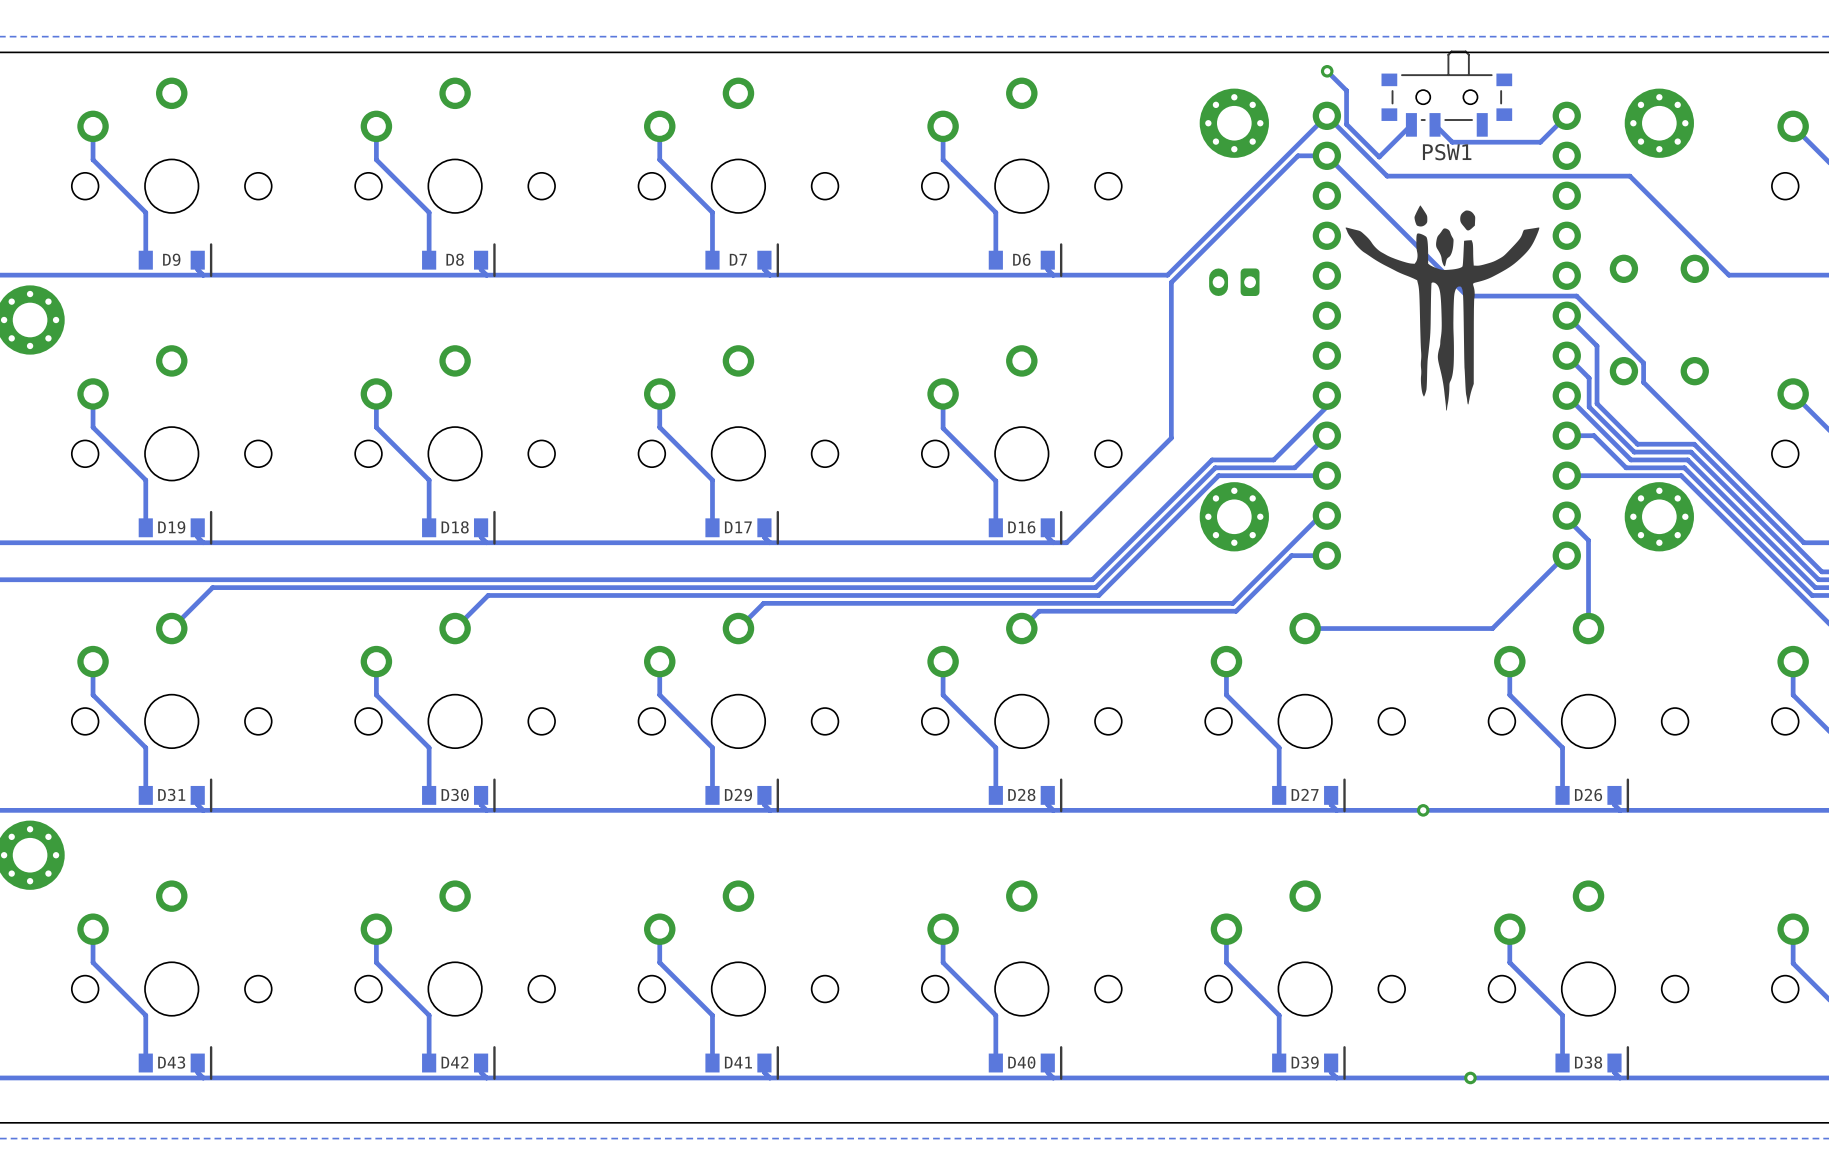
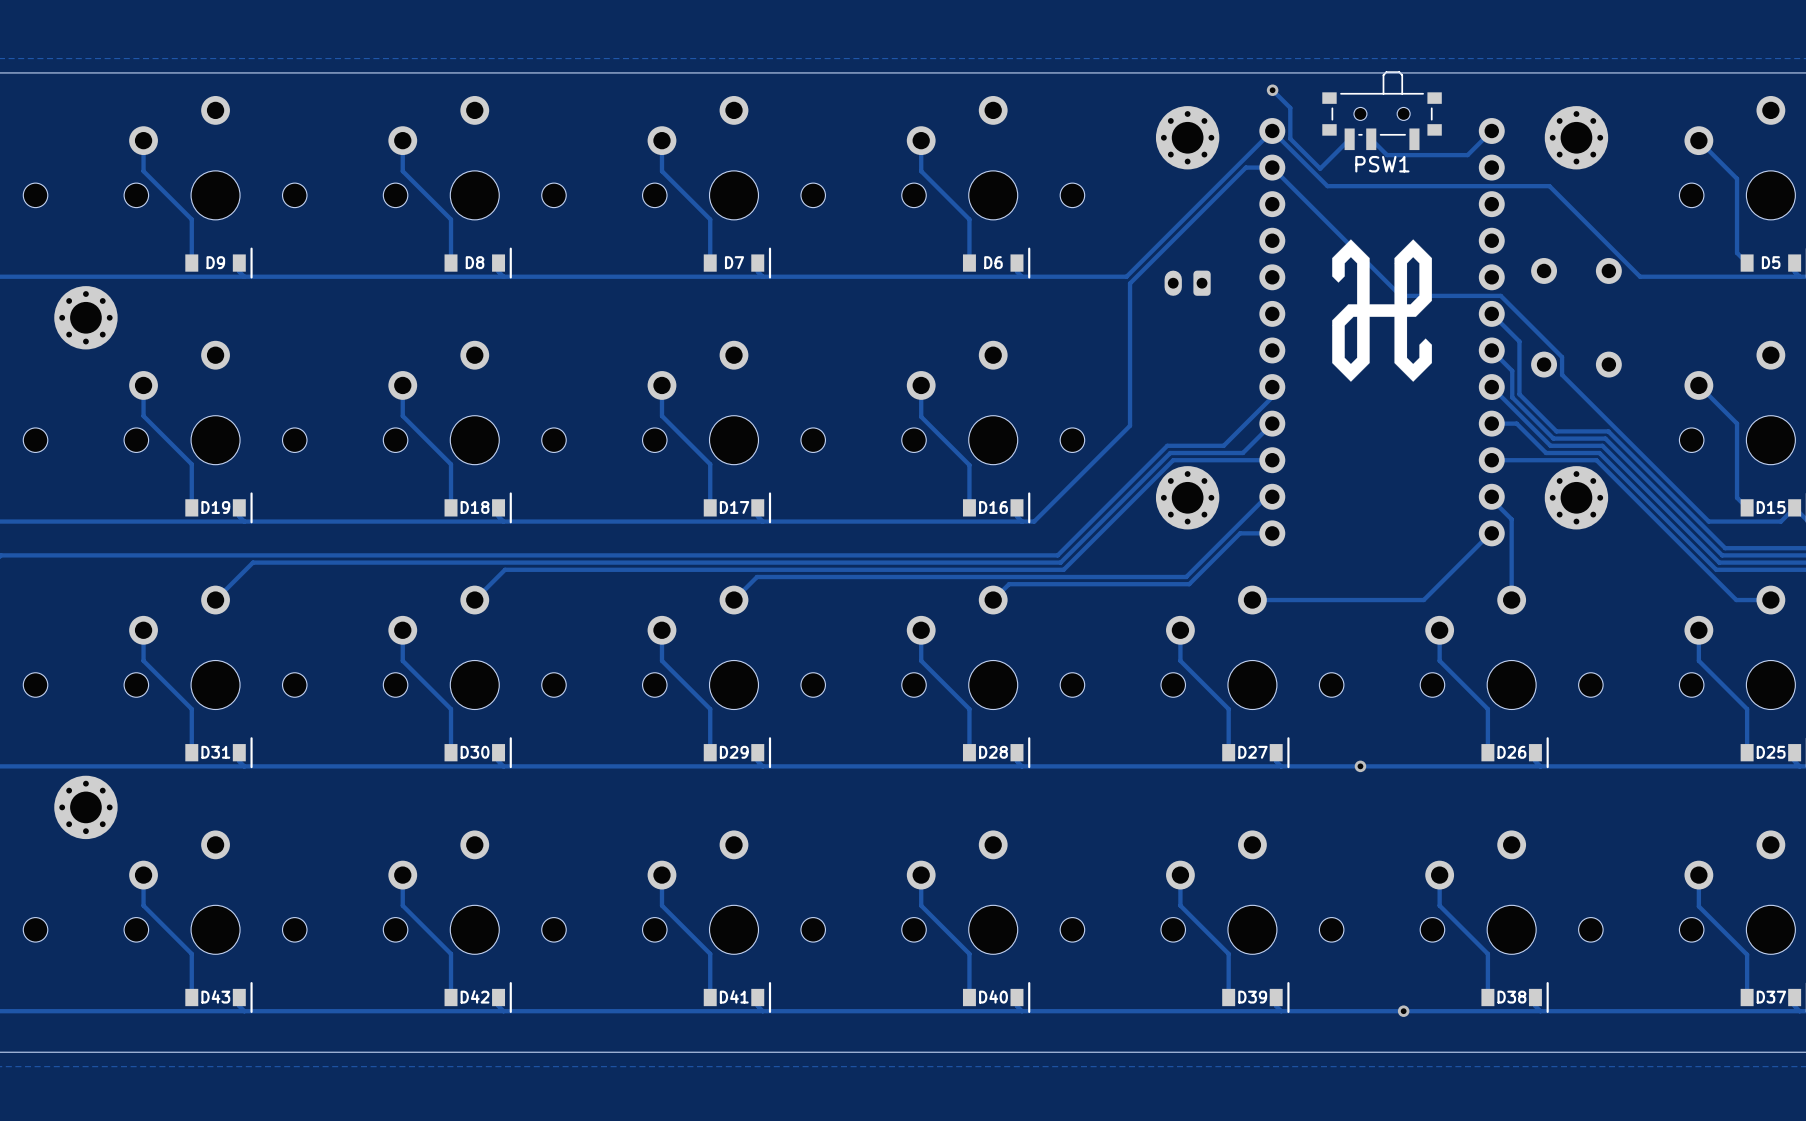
drawing shape: [1345, 205, 1540, 411] -> [1332, 239, 1432, 382]

